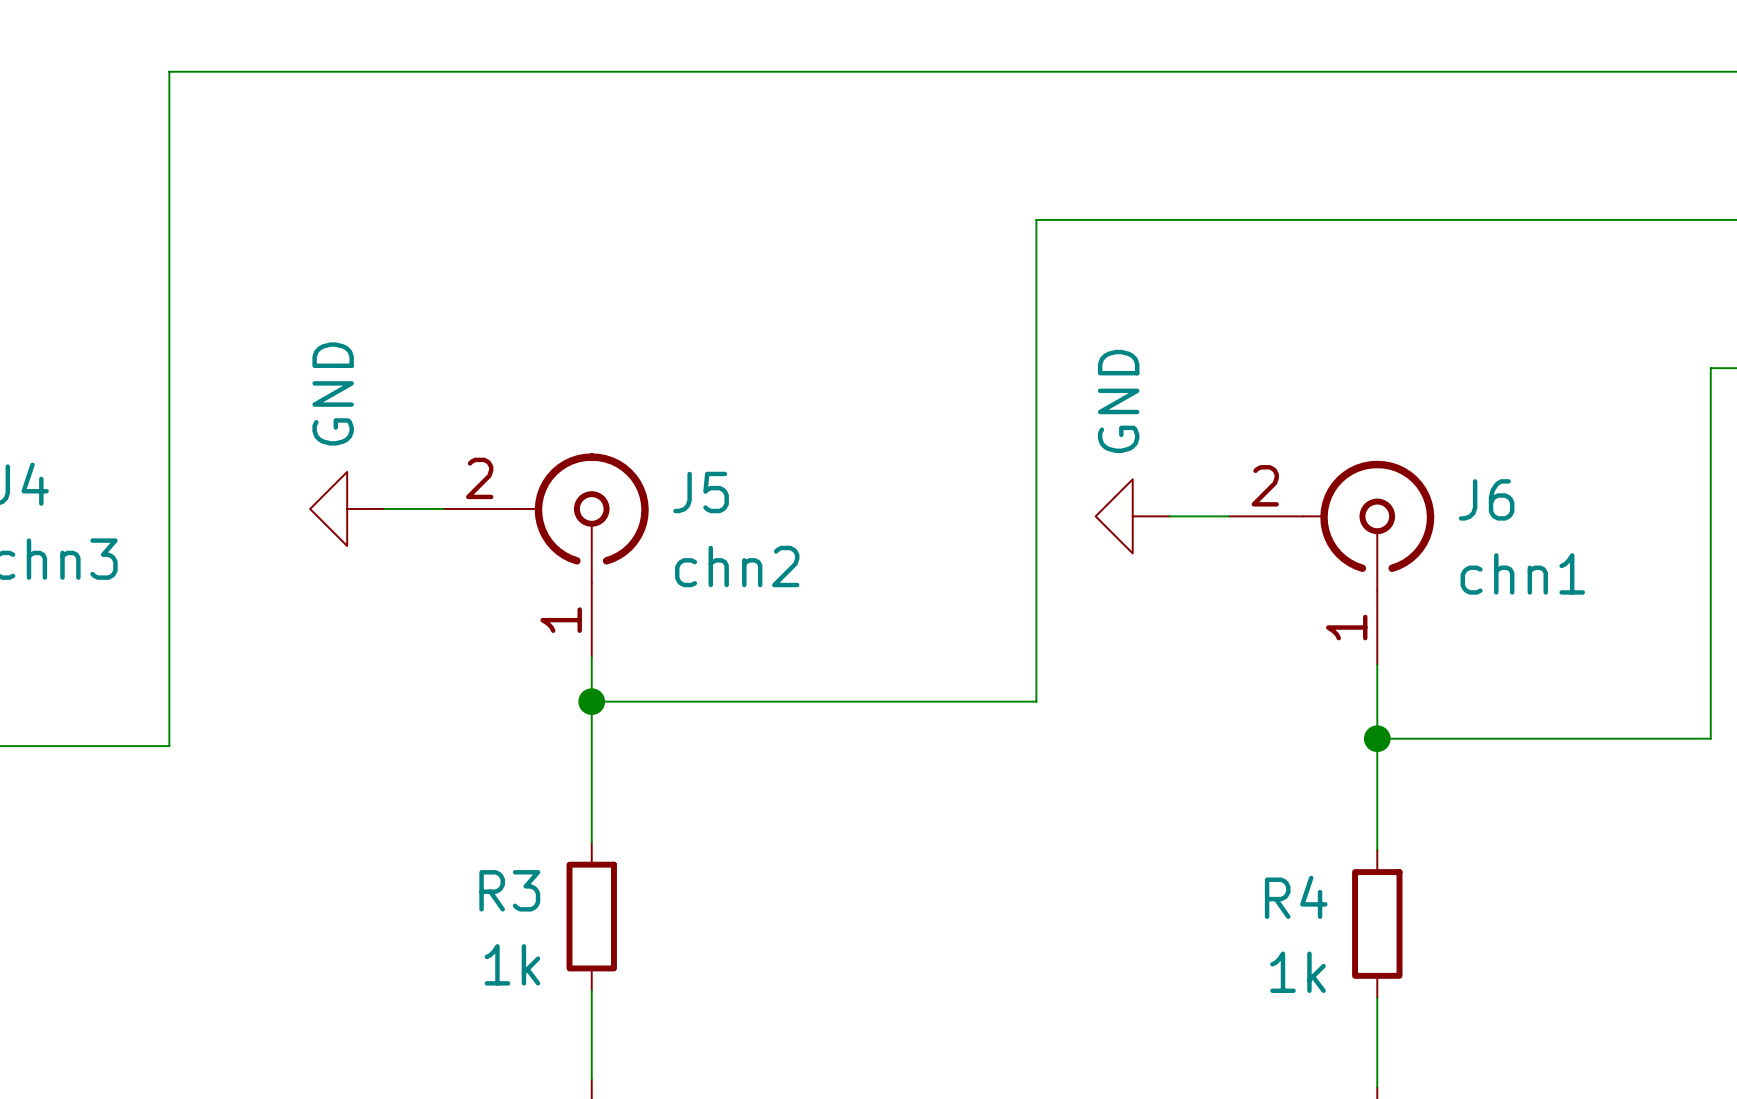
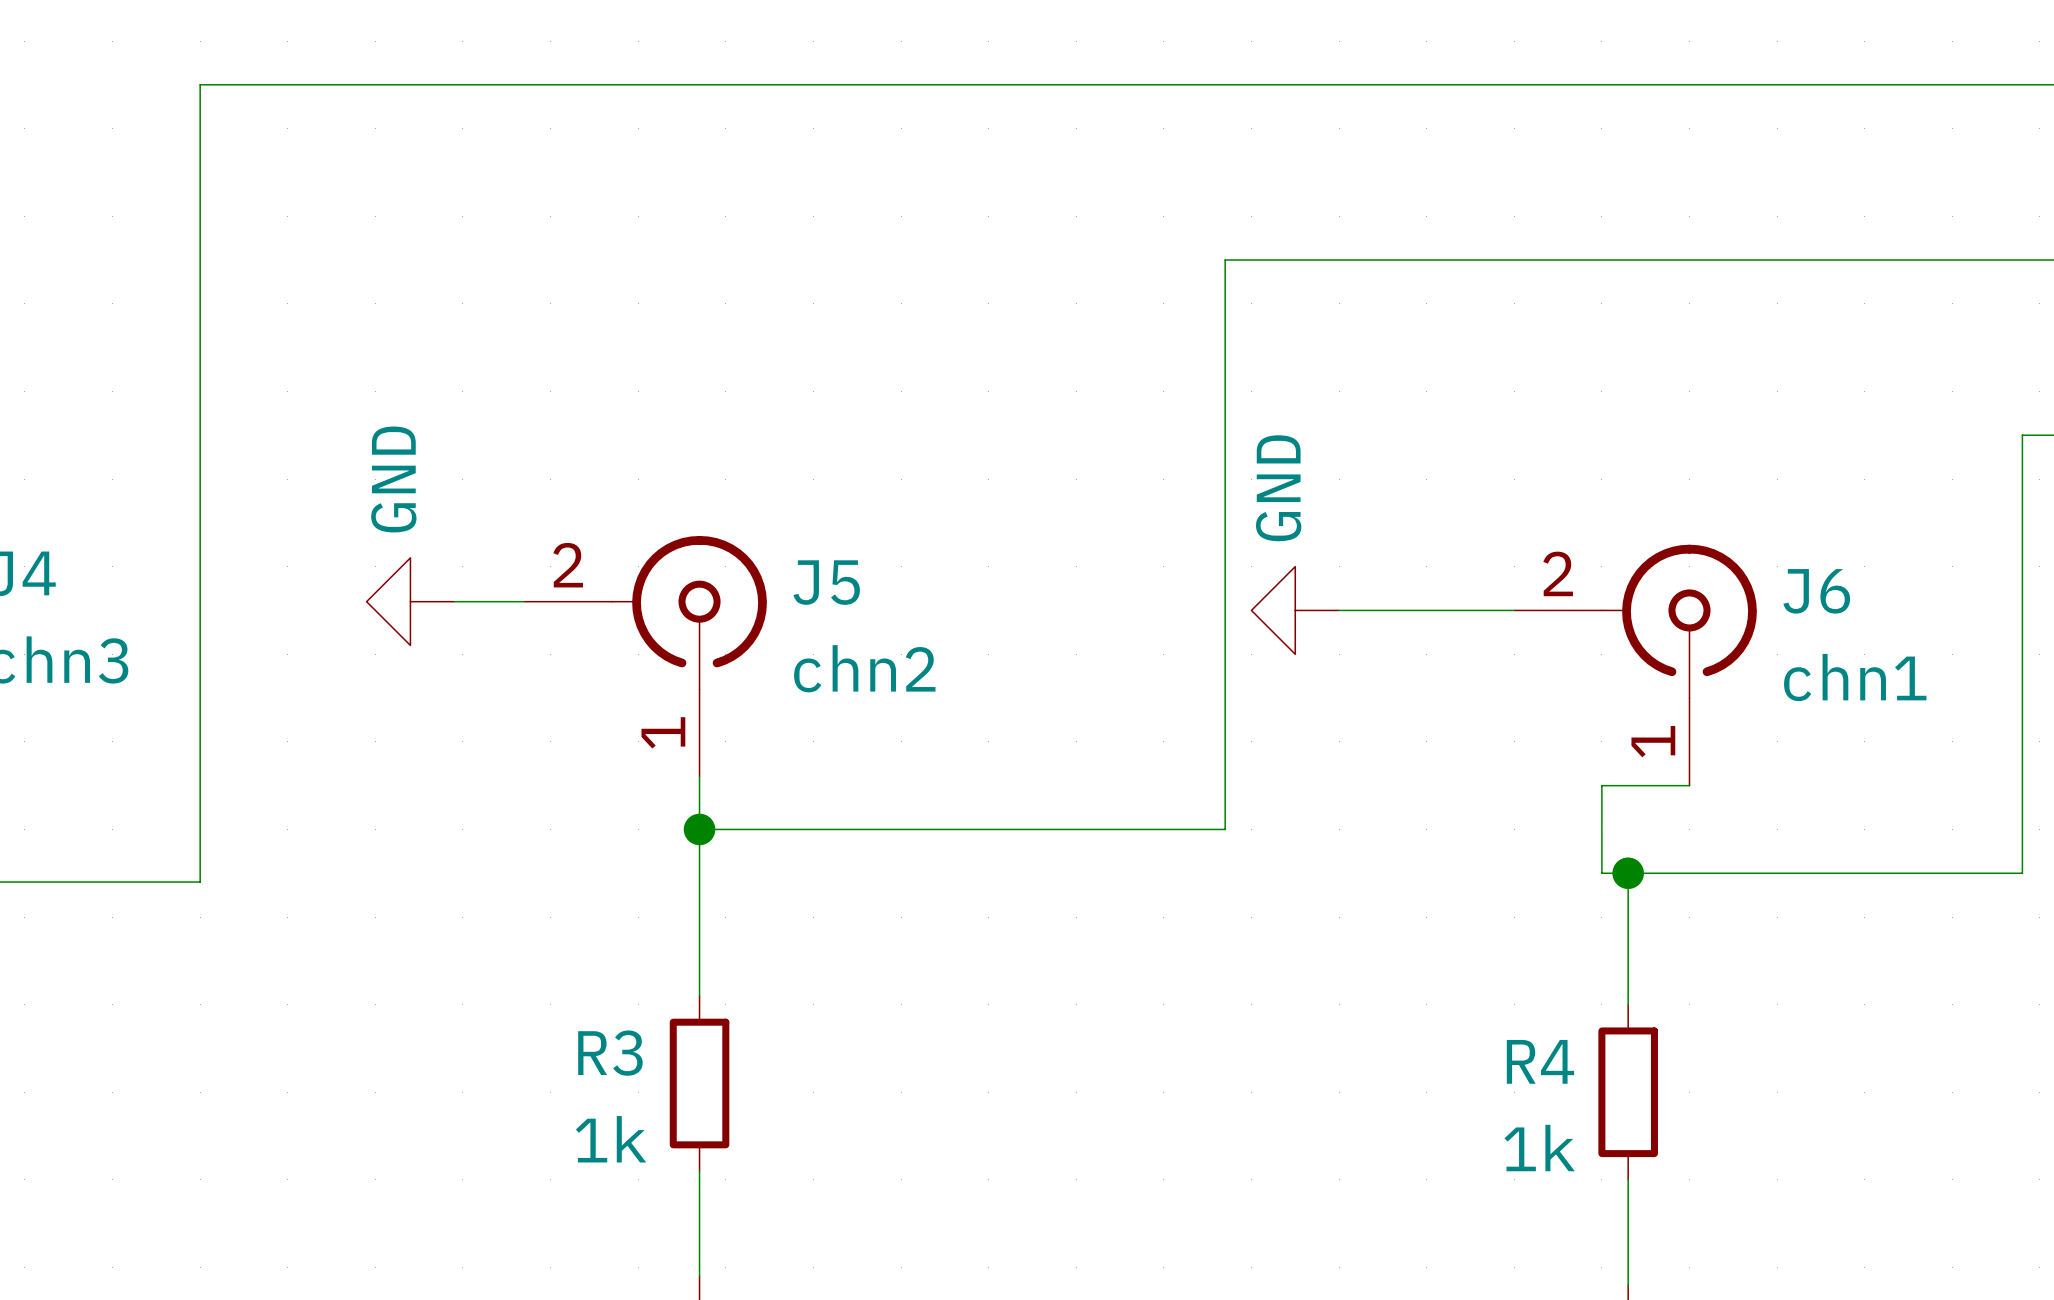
power symbol position: GND (1132, 516) -> GND (1295, 610)
J6 position: (1331, 562) -> (1635, 665)
wire: (1377, 664) (1377, 738) -> (1689, 785) (1601, 785) (1601, 873) (1628, 873)

